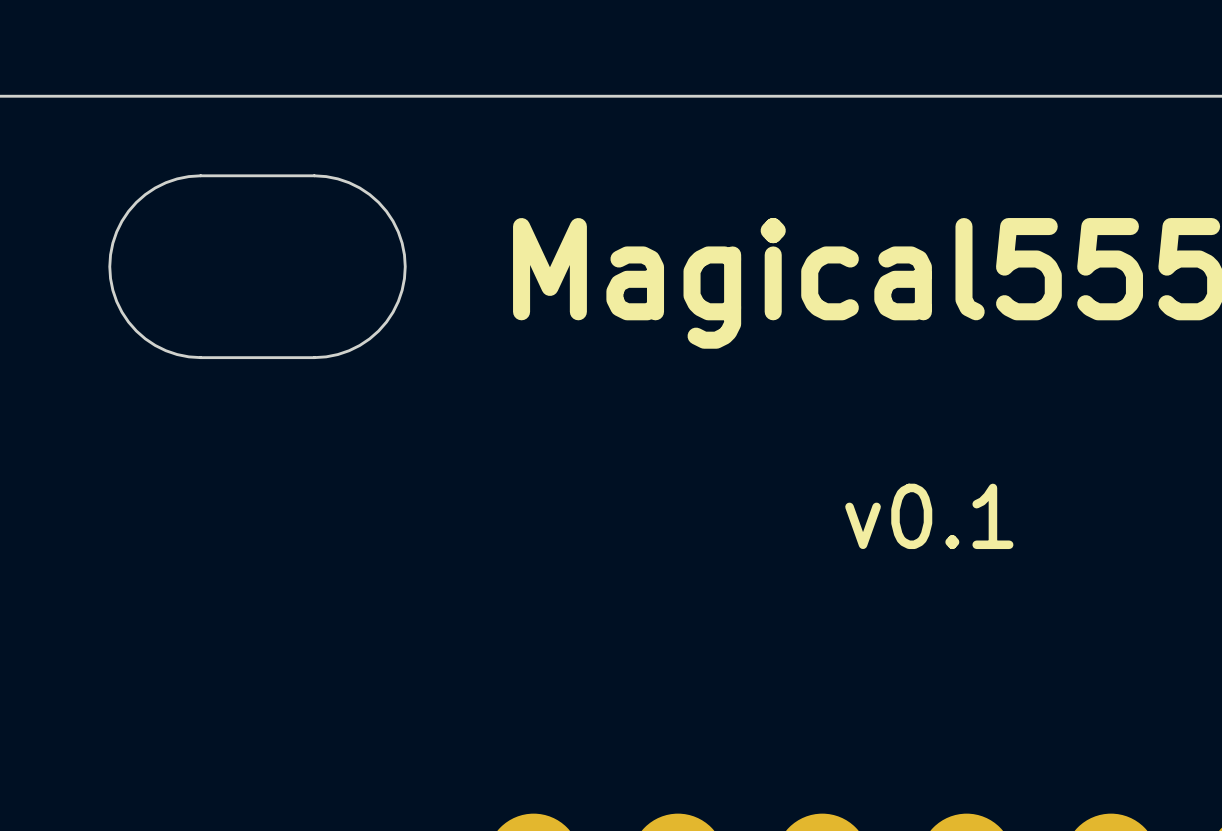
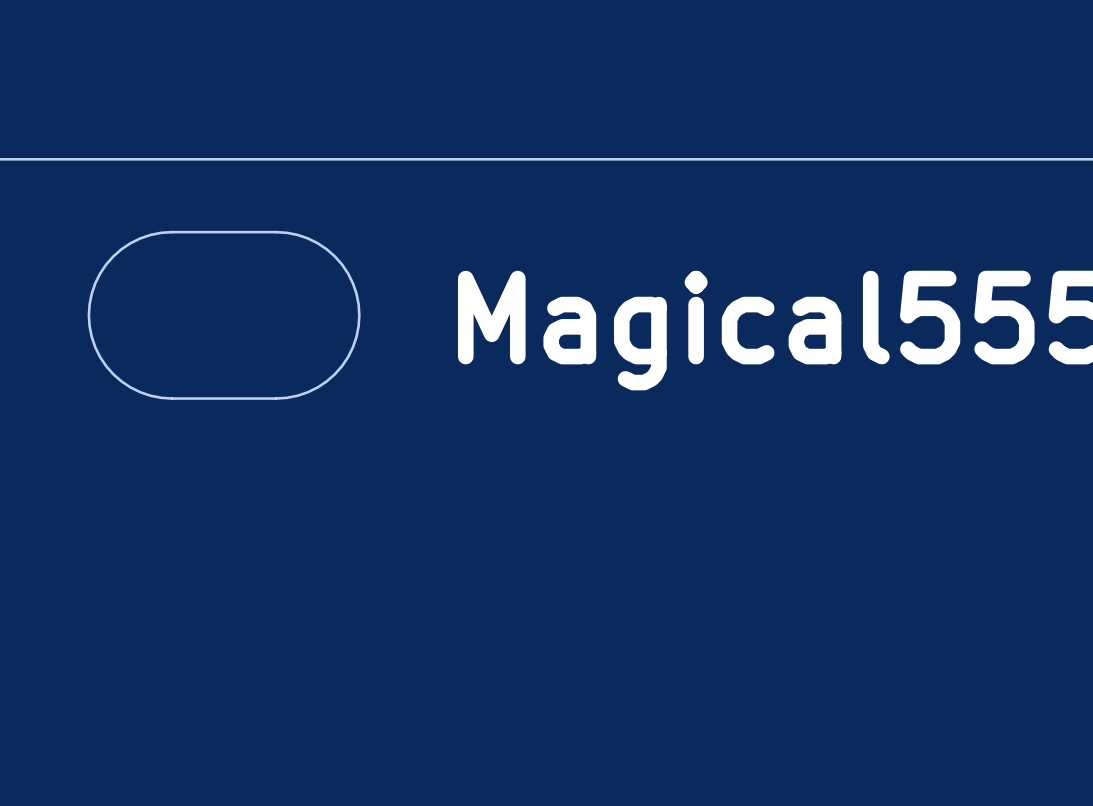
text: v0.1 (929, 516) -> none

